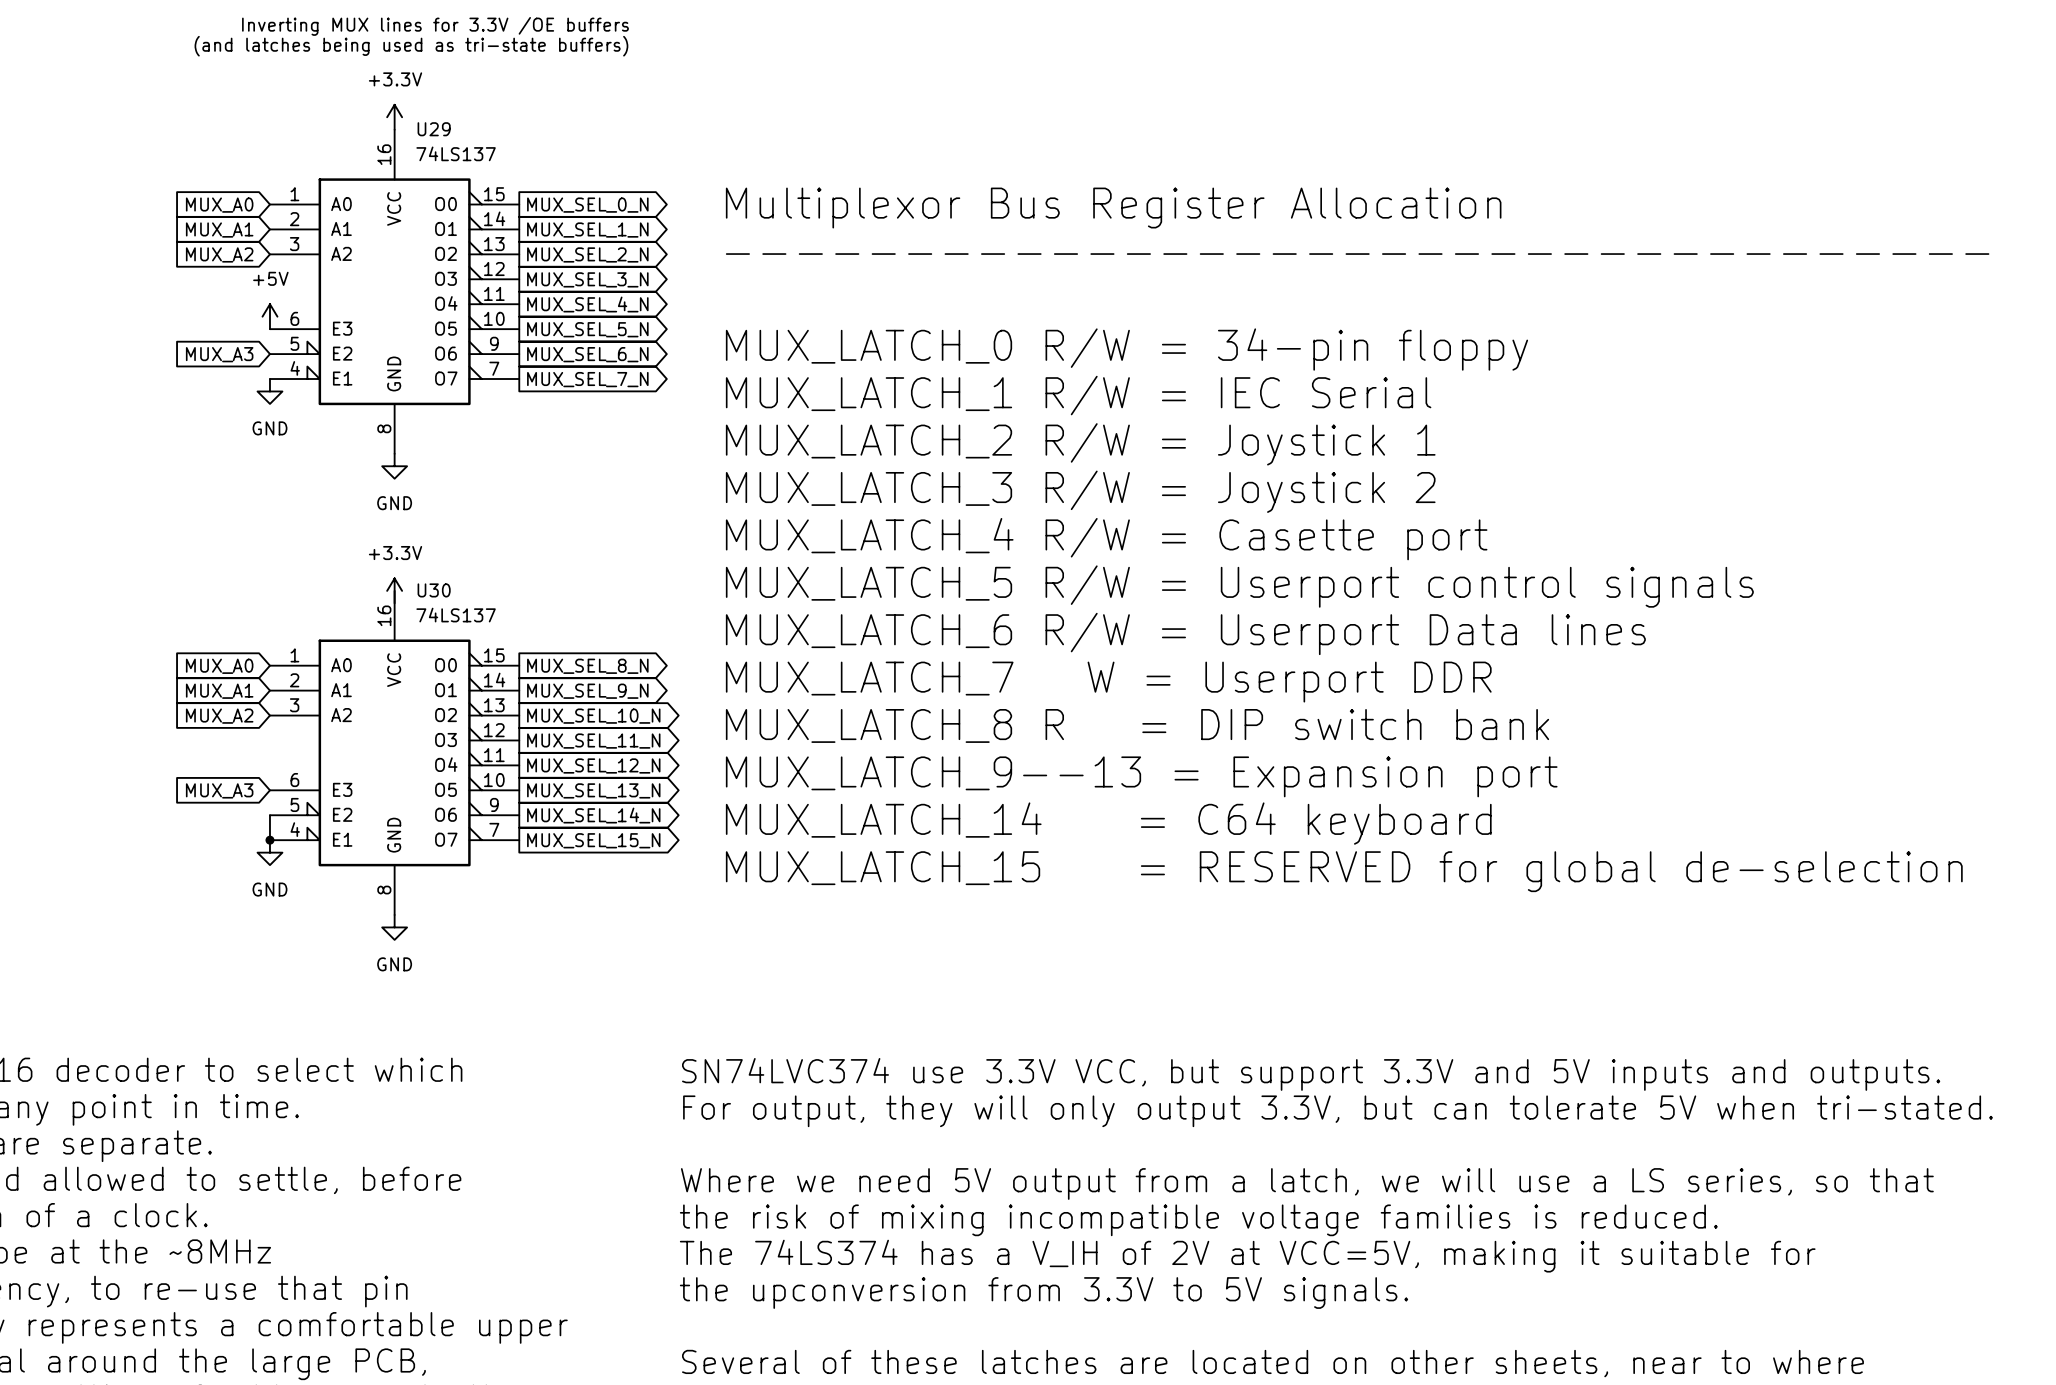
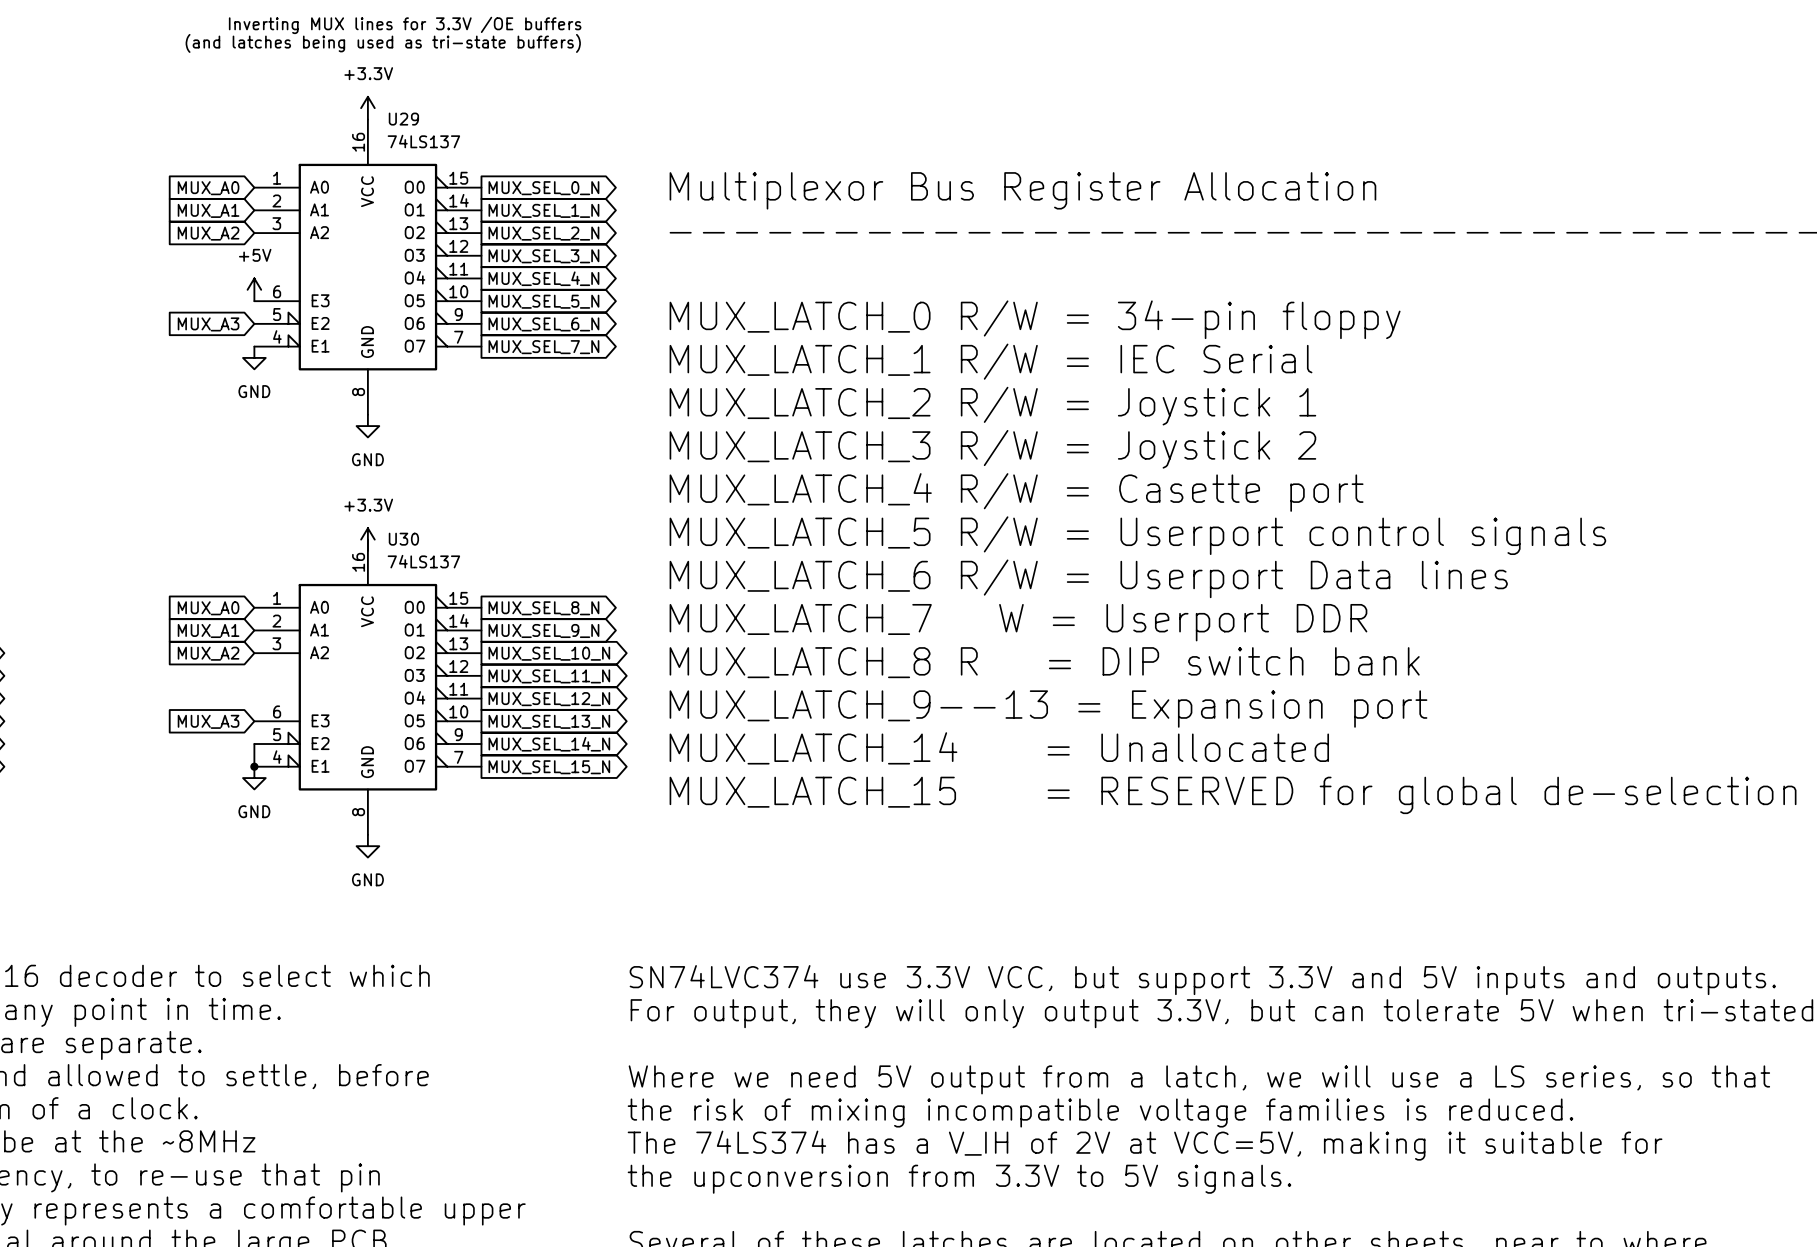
text: MUX_LATCH_14 = C64 keyboard (1108, 823) -> MUX_LATCH_14 = Unallocated (999, 748)

